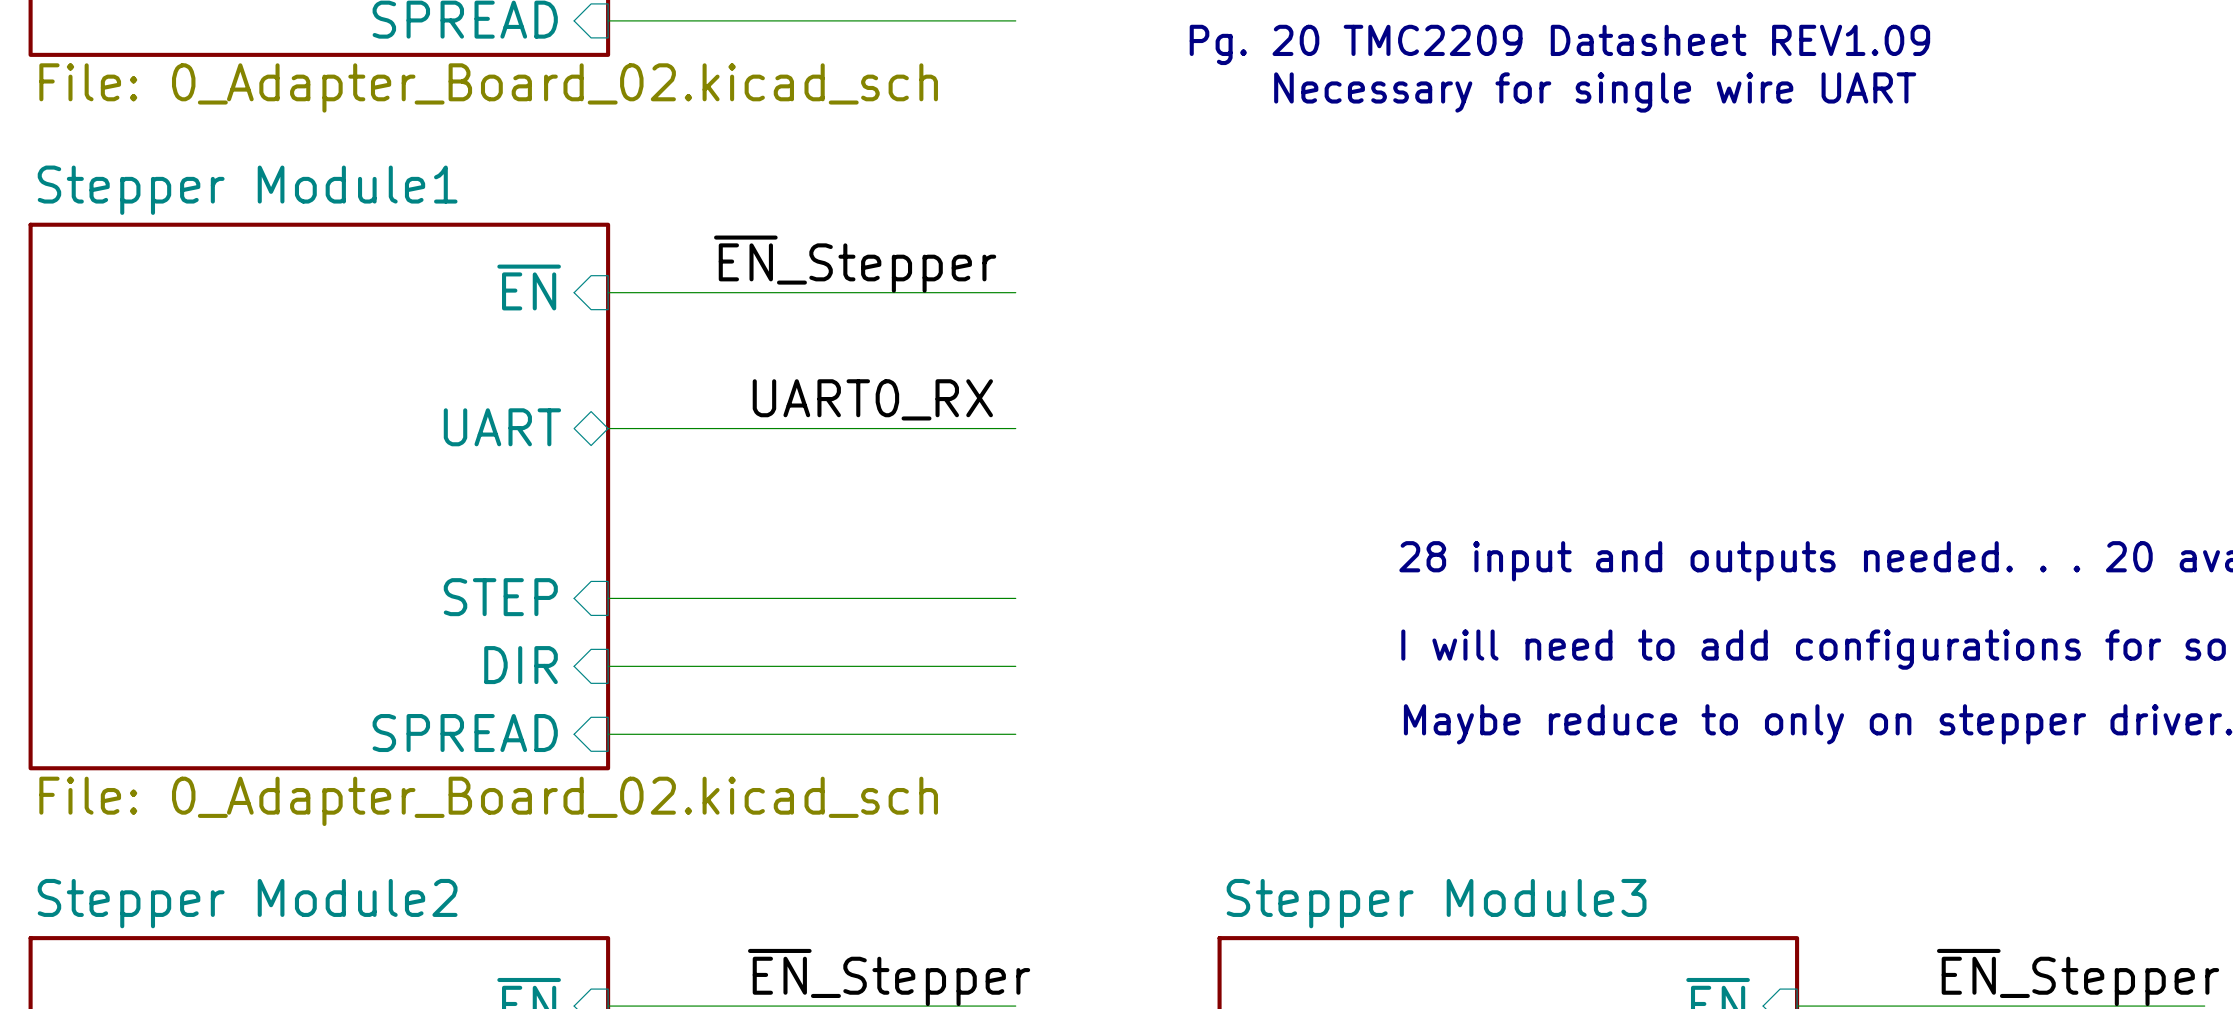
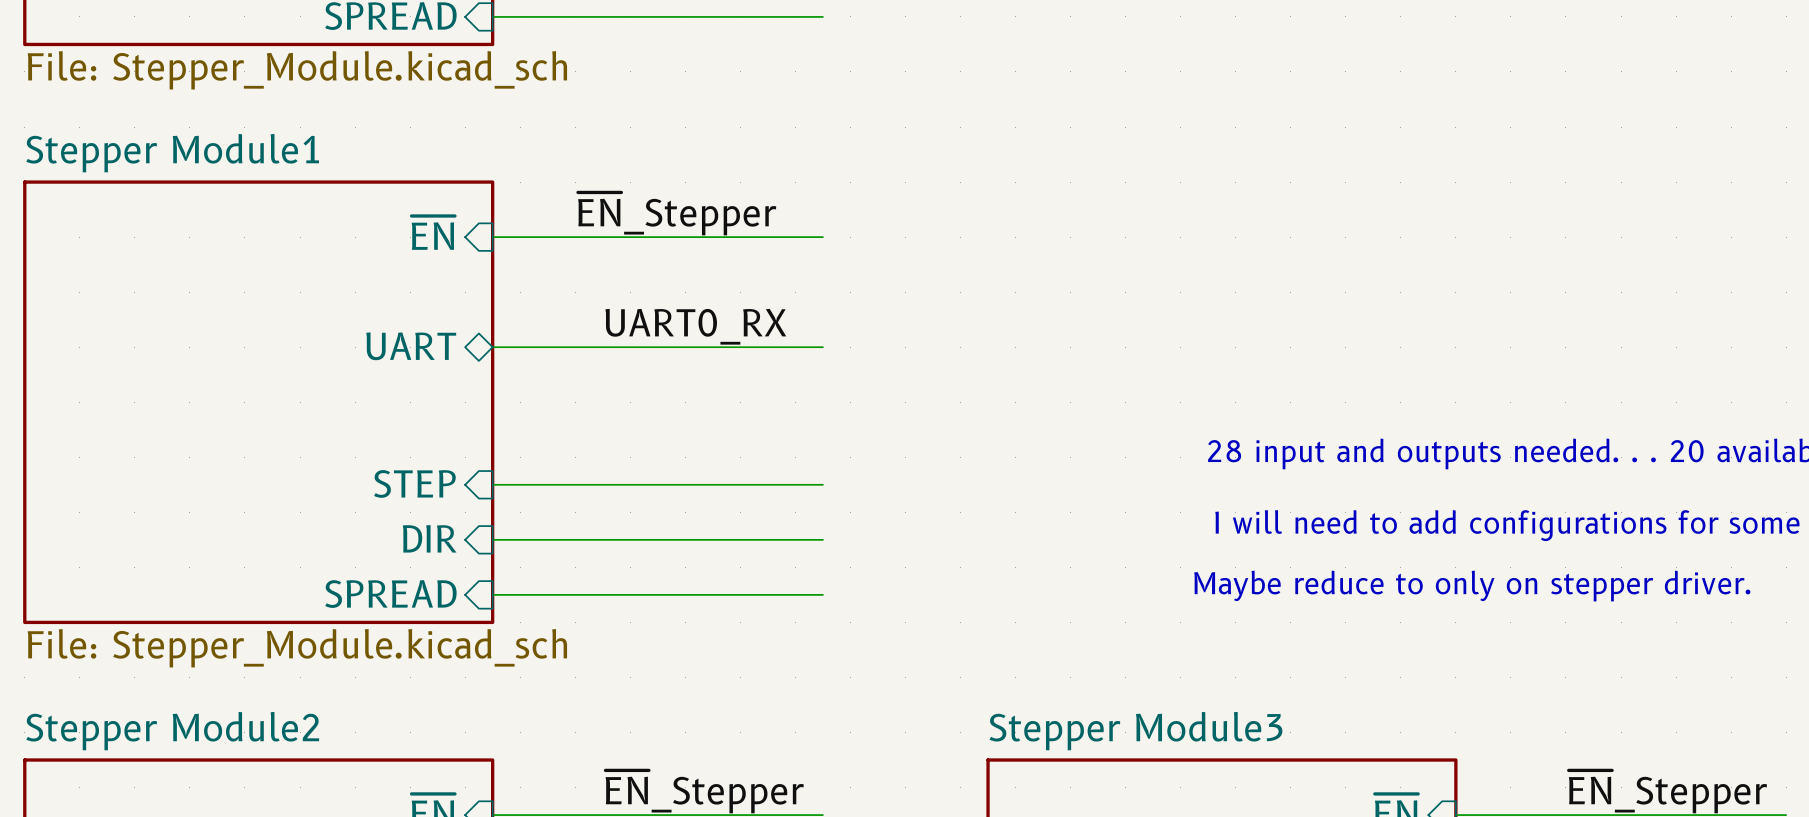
text: Pg. 20 TMC2209 Datasheet REV1.09 (1559, 44) -> none
sheet value: File: 0_Adapter_Board_02.kicad_sch (488, 87) -> File: Stepper_Module.kicad_sch (297, 70)
text: Necessary for single wire UART (1595, 92) -> none
sheet Stepper Module1 value: File: 0_Adapter_Board_02.kicad_sch (488, 801) -> File: Stepper_Module.kicad_sch (297, 648)

